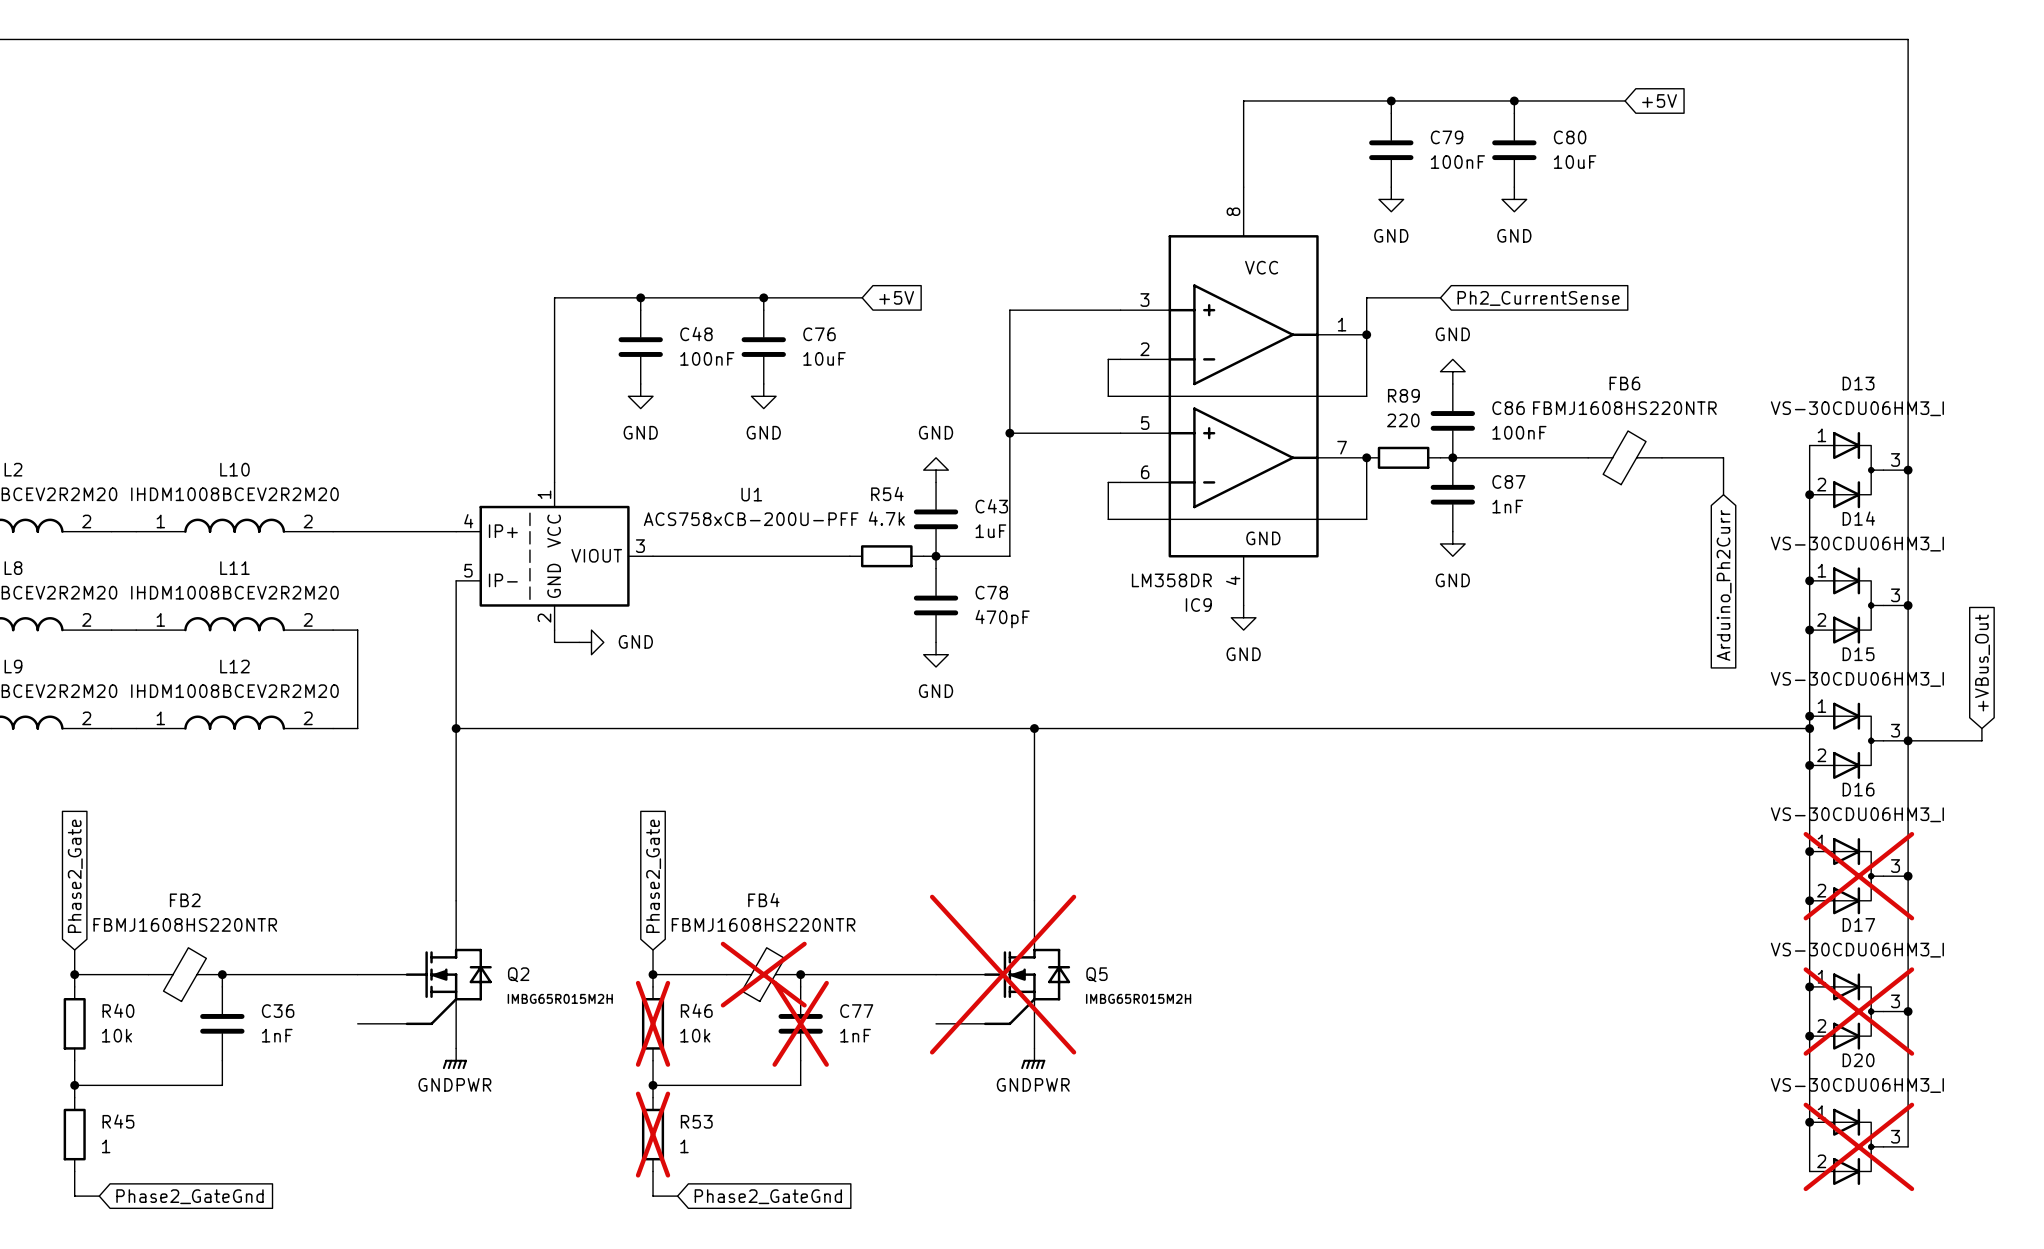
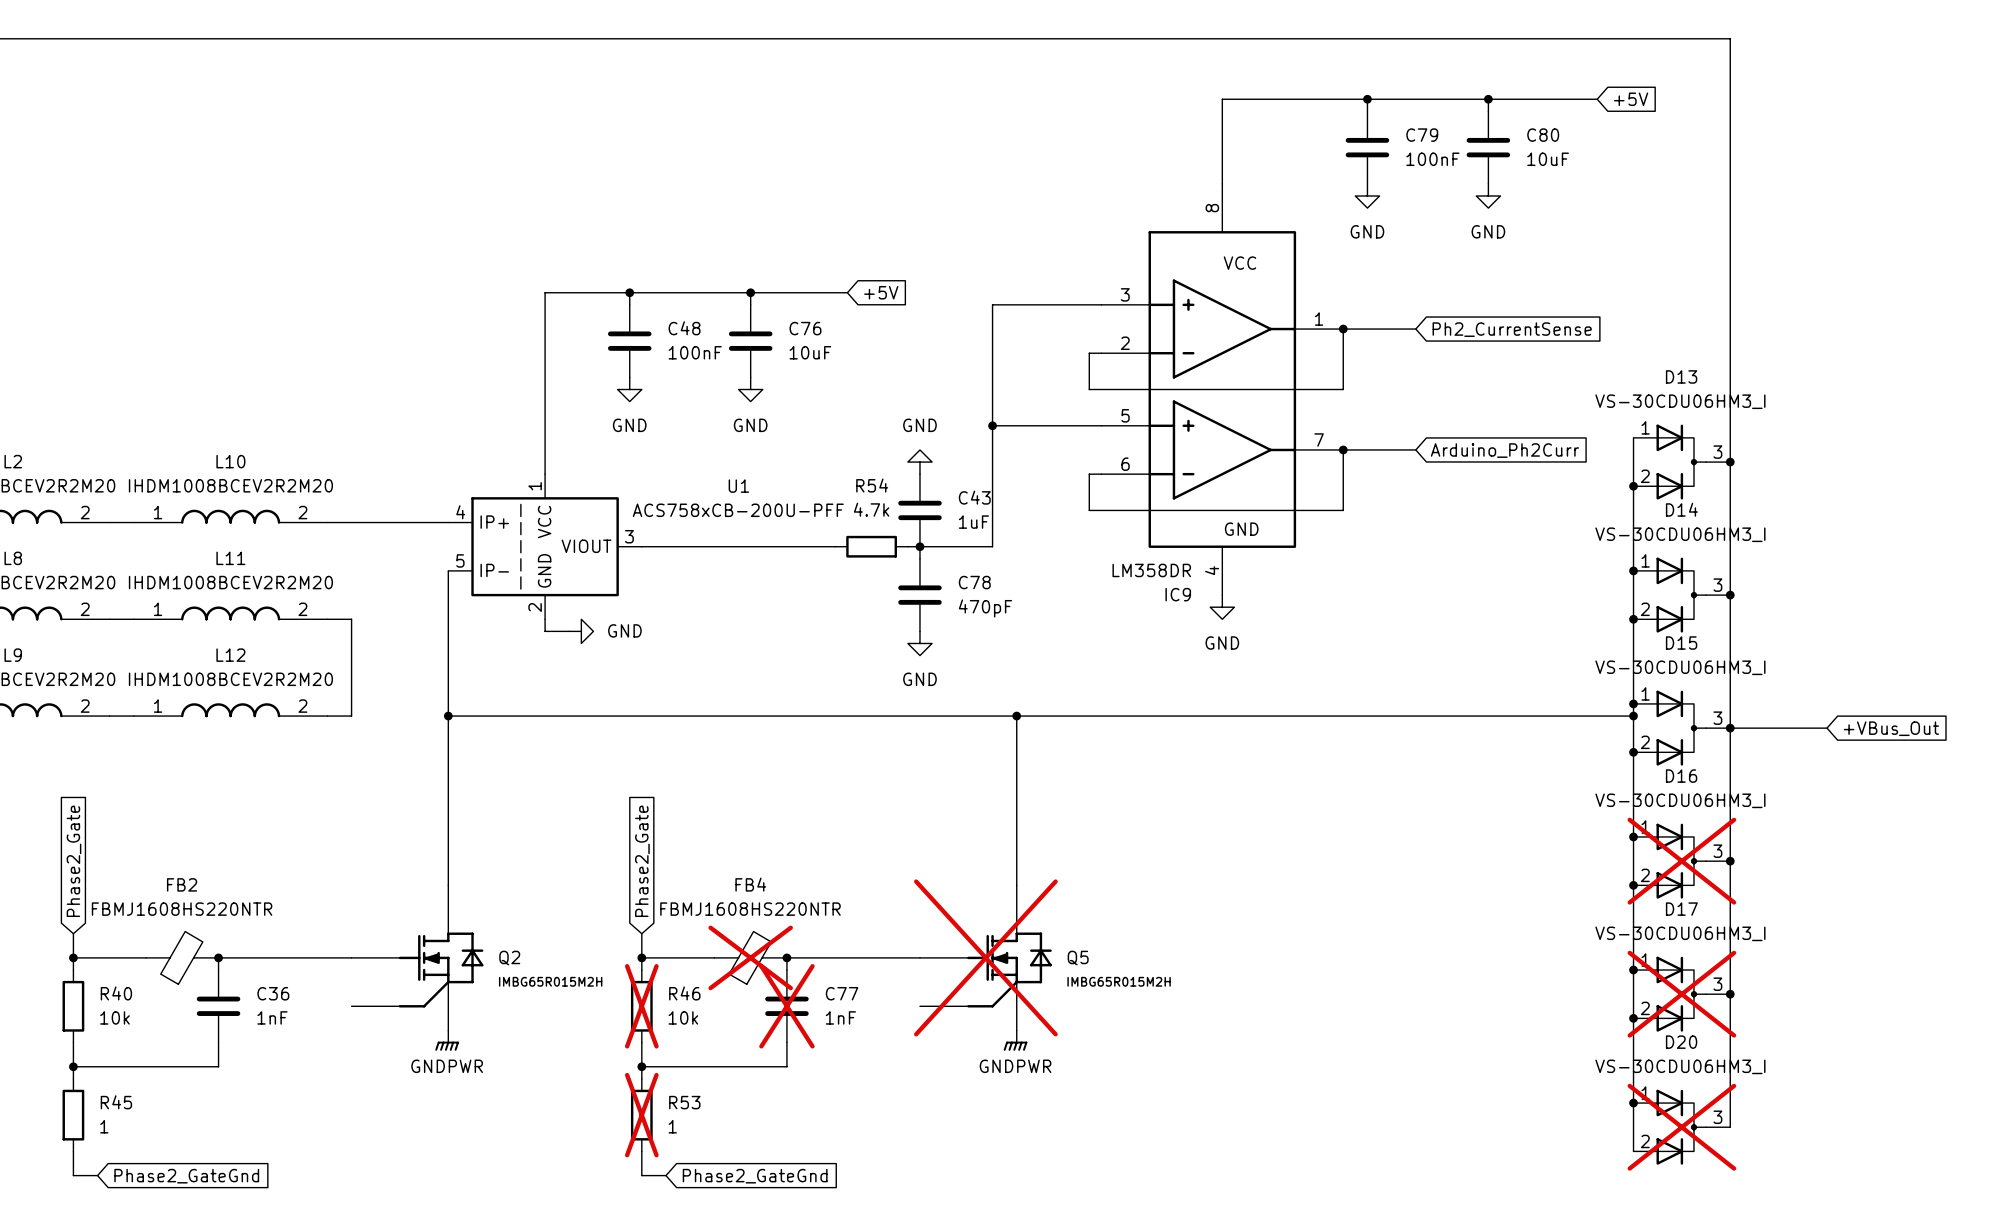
wire: (1760, 39) (1908, 39) (1908, 1146) -> (1730, 38) (1730, 1127)
wire: (1440, 297) (1366, 297) (1366, 334) -> (1415, 329) (1343, 329)
global label position: Ph2_CurrentSense (1538, 298) -> Ph2_CurrentSense (1512, 329)
power symbol: GND (1452, 371) -> none
C86: 100nF (1452, 420) -> none
wire: (1809, 445) (1809, 1171) -> (1633, 437) (1633, 1151)
R89: 220 (1403, 457) -> none
wire: (1440, 457) (1588, 457) -> (1415, 449) (1343, 449)
junction: (1452, 457) -> none
FB6: FBMJ1608HS220NTR (1625, 457) -> none
wire: (1662, 457) (1723, 457) (1723, 494) -> none
global label: none -> Arduino_Ph2Curr (1504, 450)
D13 position: (1858, 470) -> (1681, 462)
junction: (1908, 470) -> none
C87: 1nF (1452, 494) -> none
junction: none -> (1633, 486)
junction position: (1809, 494) -> (1730, 462)
power symbol: GND (1452, 543) -> none
junction: none -> (1633, 570)
junction: (1809, 580) -> none
global label: Arduino_Ph2Curr (1724, 585) -> none
junction: none -> (1730, 595)
D14 position: (1858, 605) -> (1681, 595)
junction: (1908, 605) -> none
junction: none -> (1633, 619)
junction: (1809, 630) -> none
global label rotation: 0° (1982, 663) -> 90° clockwise (1891, 728)
junction: none -> (1633, 703)
junction: (1809, 716) -> none
wire: (1662, 728) (1809, 728) -> none
junction: none -> (1633, 716)
junction: (1809, 728) -> none
wire: (1981, 728) (1981, 740) (1908, 740) -> none
wire: none -> (1730, 728) (1827, 728)
junction: none -> (1730, 728)
D15 position: (1858, 740) -> (1681, 728)
junction: (1908, 740) -> none
junction: none -> (1633, 752)
junction: (1809, 765) -> none
junction: none -> (1633, 836)
junction: (1809, 851) -> none
junction: none -> (1730, 861)
D16 position: (1858, 876) -> (1681, 861)
junction: (1908, 876) -> none
junction: none -> (1633, 885)
junction: (1809, 900) -> none
junction: none -> (1633, 970)
junction: (1809, 986) -> none
junction: none -> (1730, 994)
D17 position: (1858, 1011) -> (1681, 994)
junction: (1908, 1011) -> none
junction: none -> (1633, 1018)
junction: (1809, 1036) -> none
junction: none -> (1633, 1103)
junction: (1809, 1122) -> none
D20 position: (1858, 1146) -> (1681, 1127)

